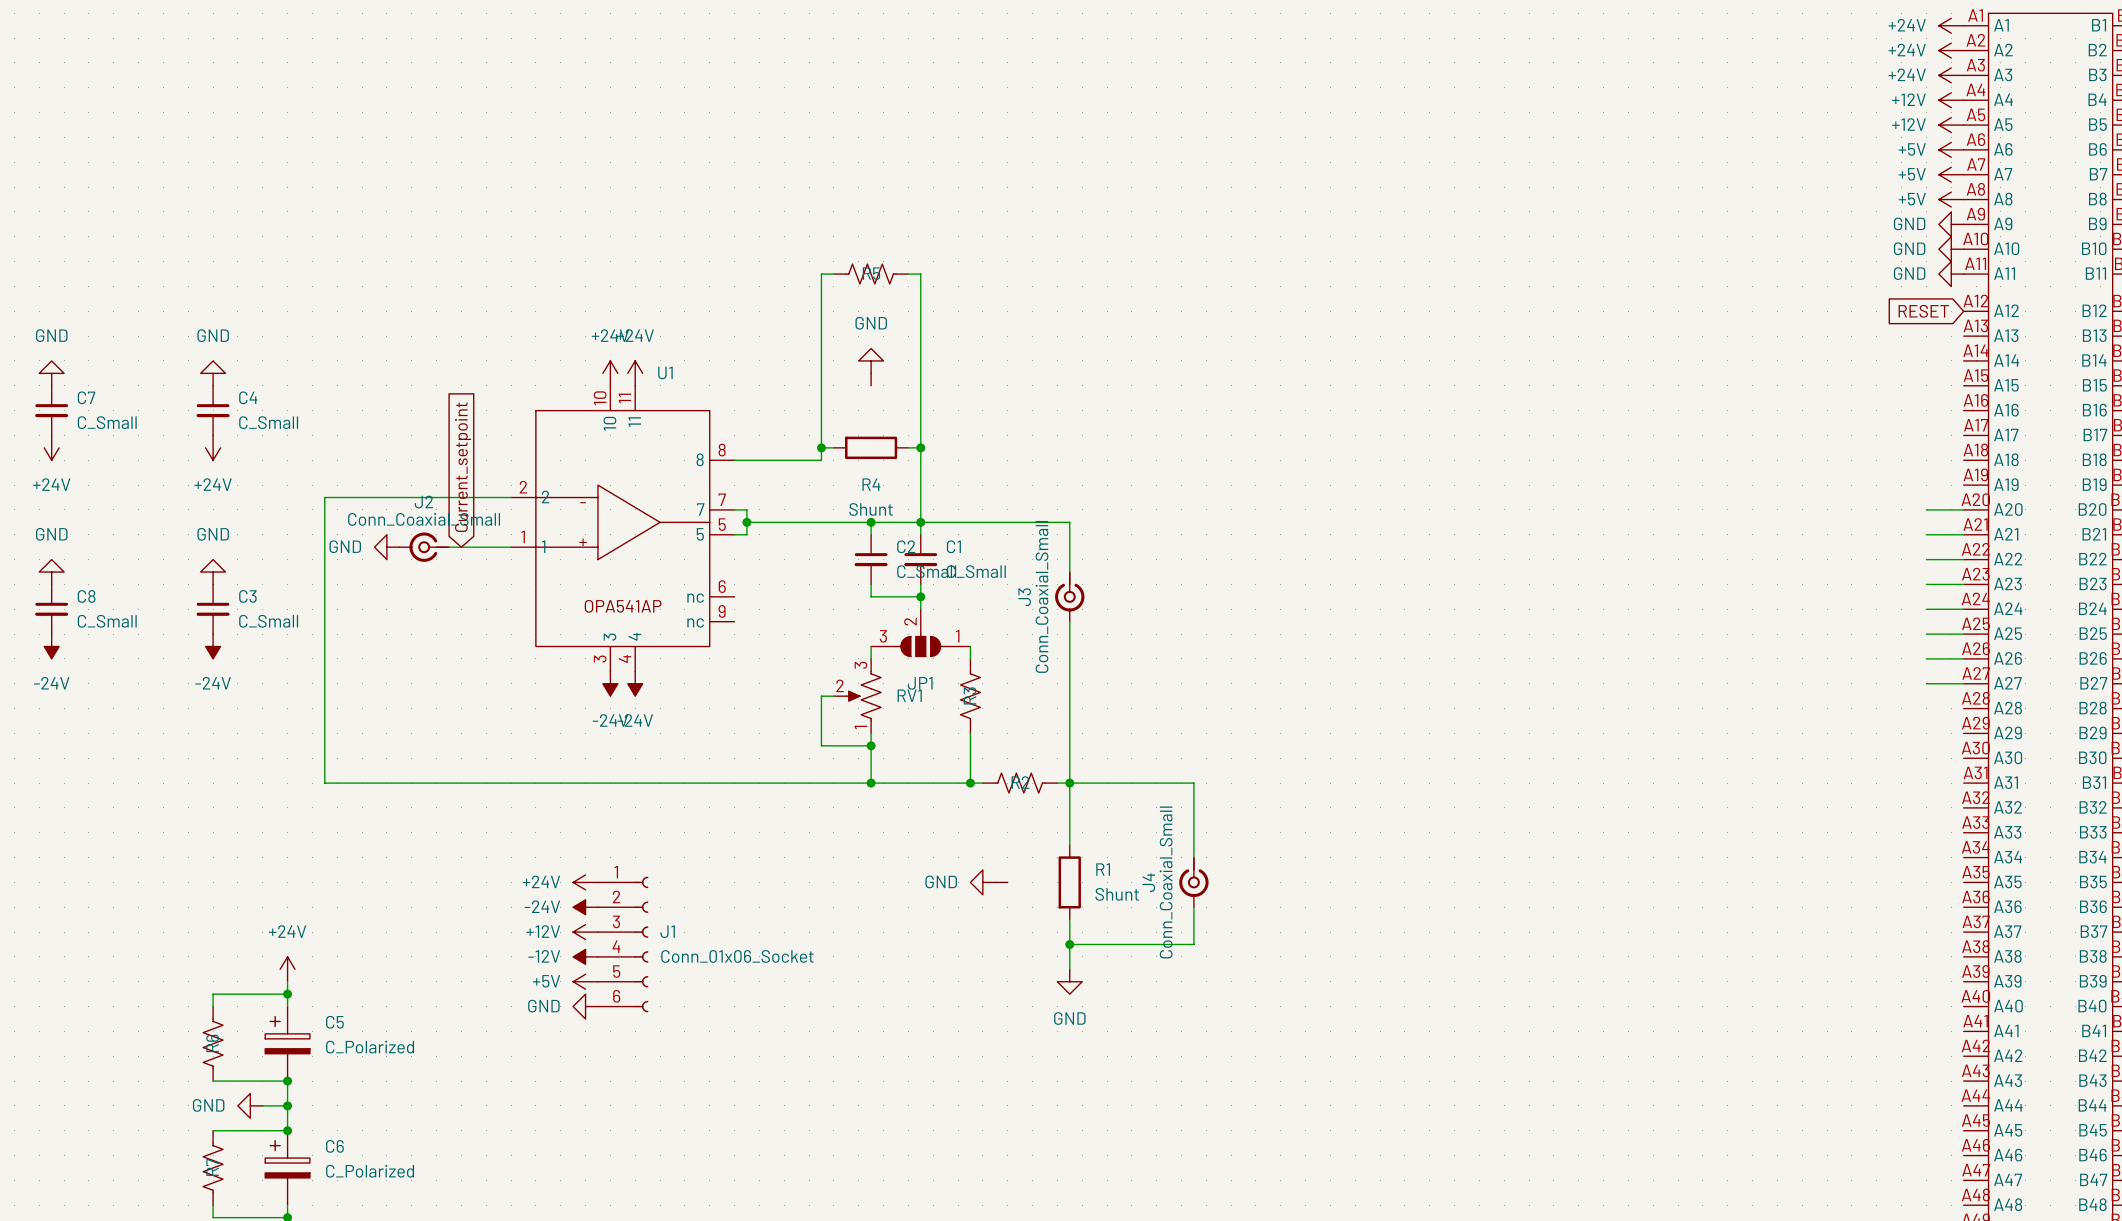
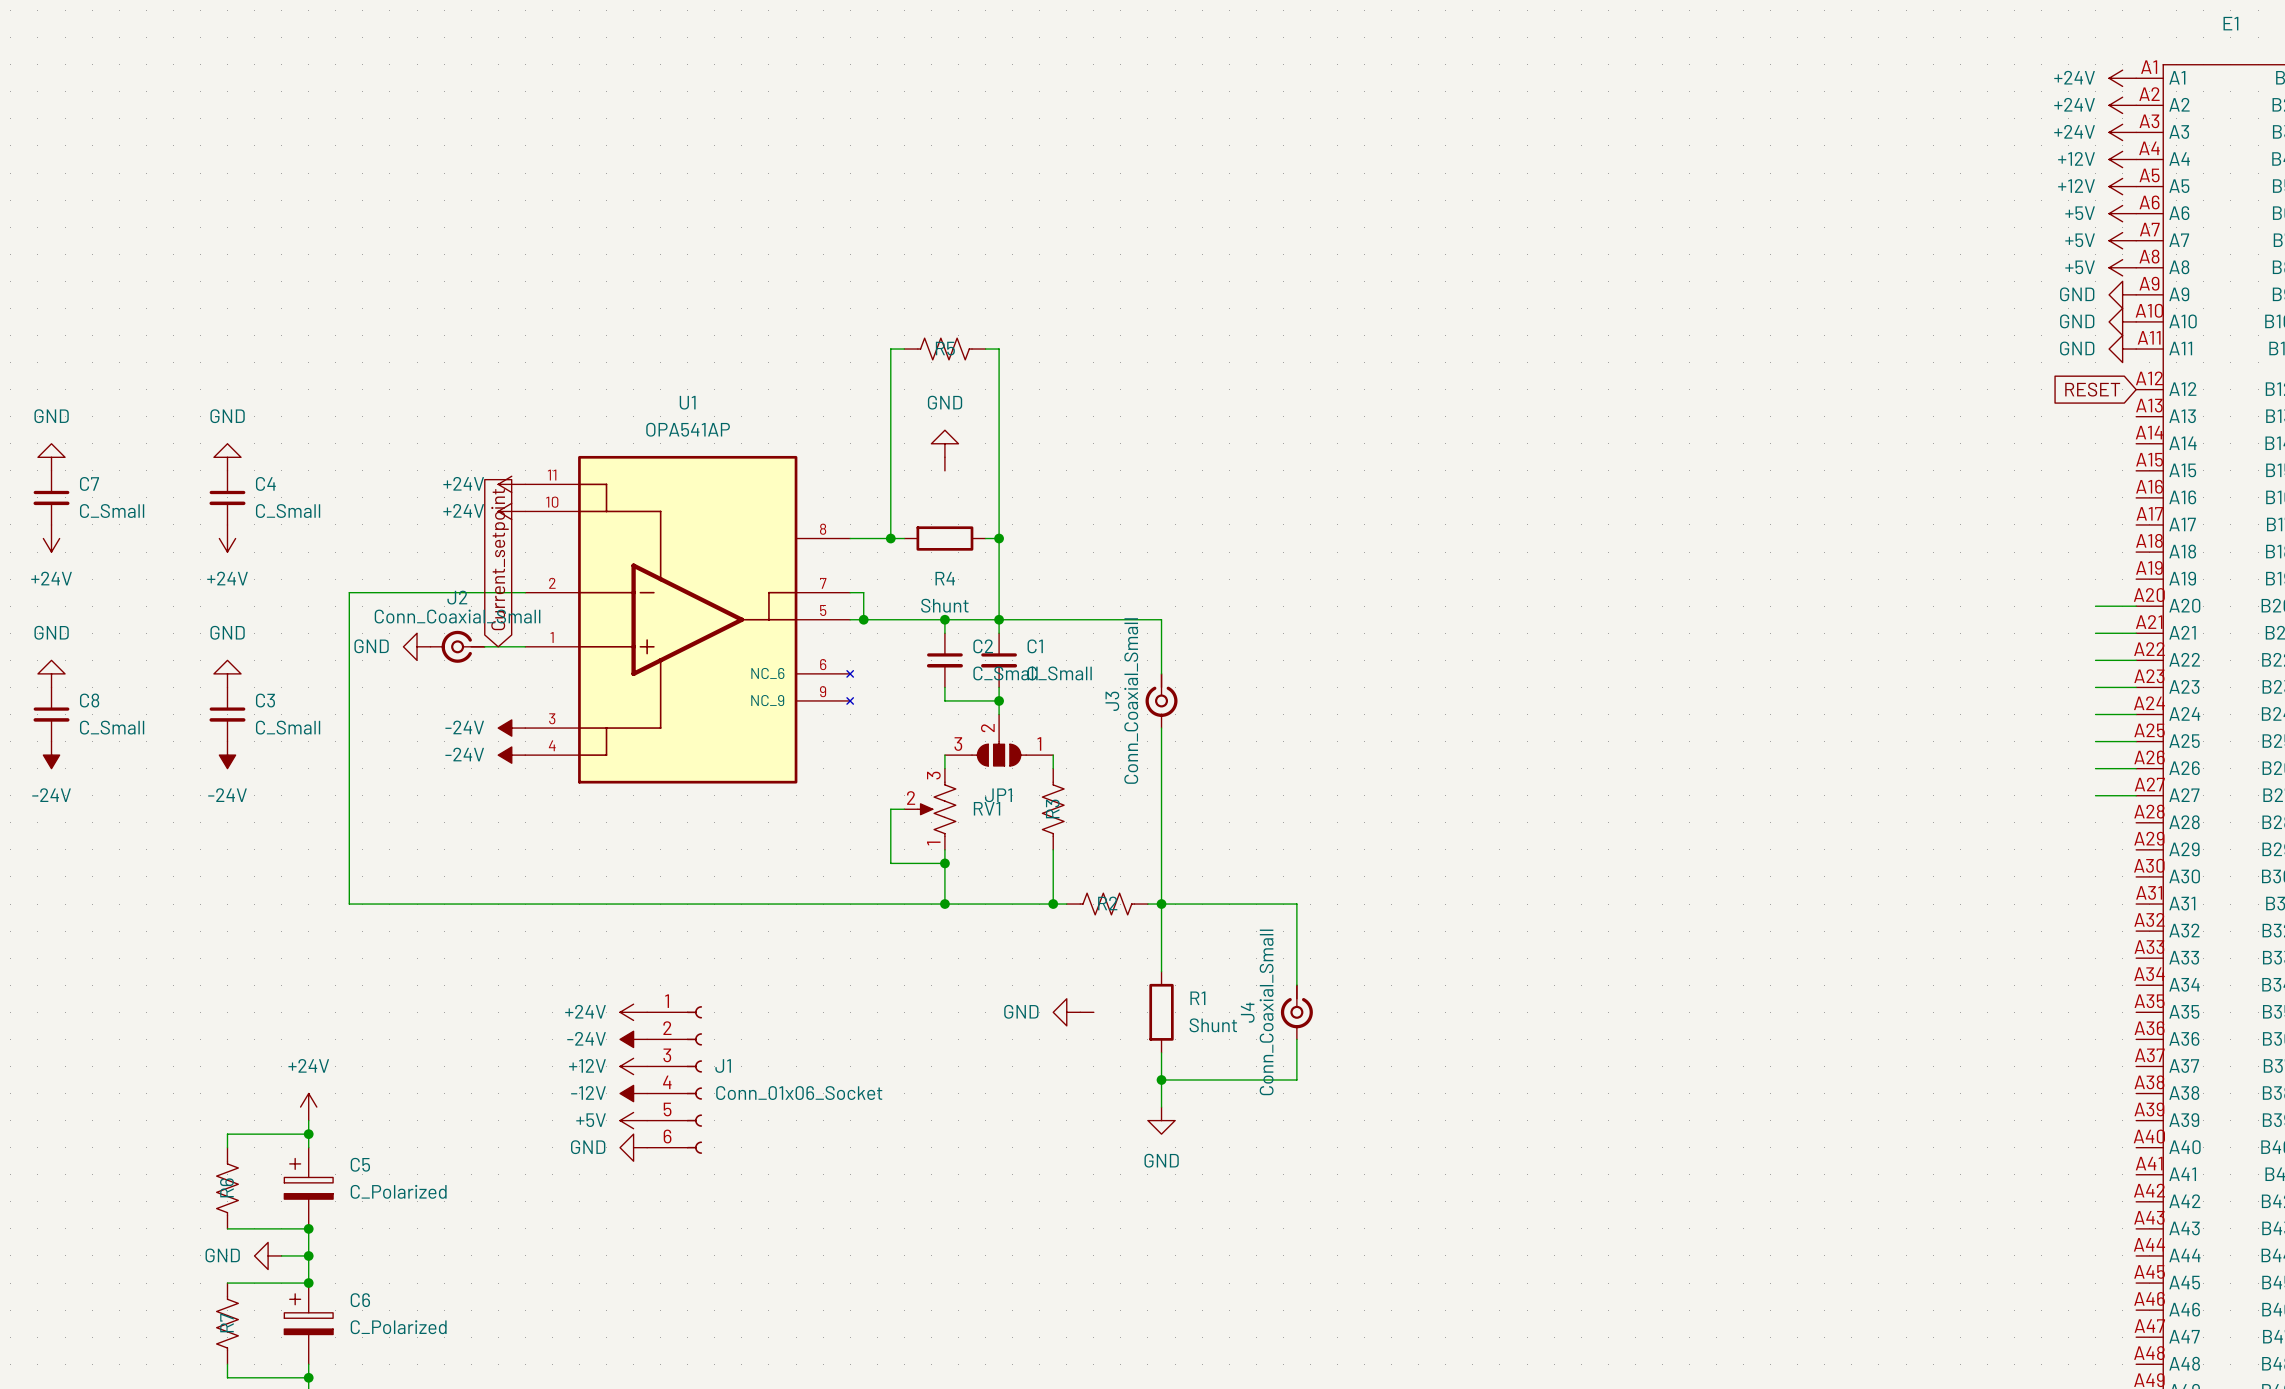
U1 value: none -> OPA541AP (688, 429)
U1 name position: U1 (665, 372) -> U1 (687, 402)
power symbol: +24V (610, 373) -> none
power symbol: +24V (635, 373) -> none
U1 symbol: [511, 385, 735, 672] -> [525, 455, 854, 784]
power symbol: none -> +24V (511, 484)
power symbol: none -> +24V (511, 511)
wire: (821, 447) (821, 460) (734, 460) -> (890, 538) (850, 538)
wire: none -> (850, 592) (863, 592) (863, 619)
wire: (734, 509) (746, 509) (746, 534) (734, 534) -> none
junction position: (746, 522) -> (863, 619)
power symbol: none -> -24V (511, 728)
power symbol: none -> -24V (511, 755)
power symbol: -24V (610, 683) -> none
power symbol: -24V (635, 683) -> none

